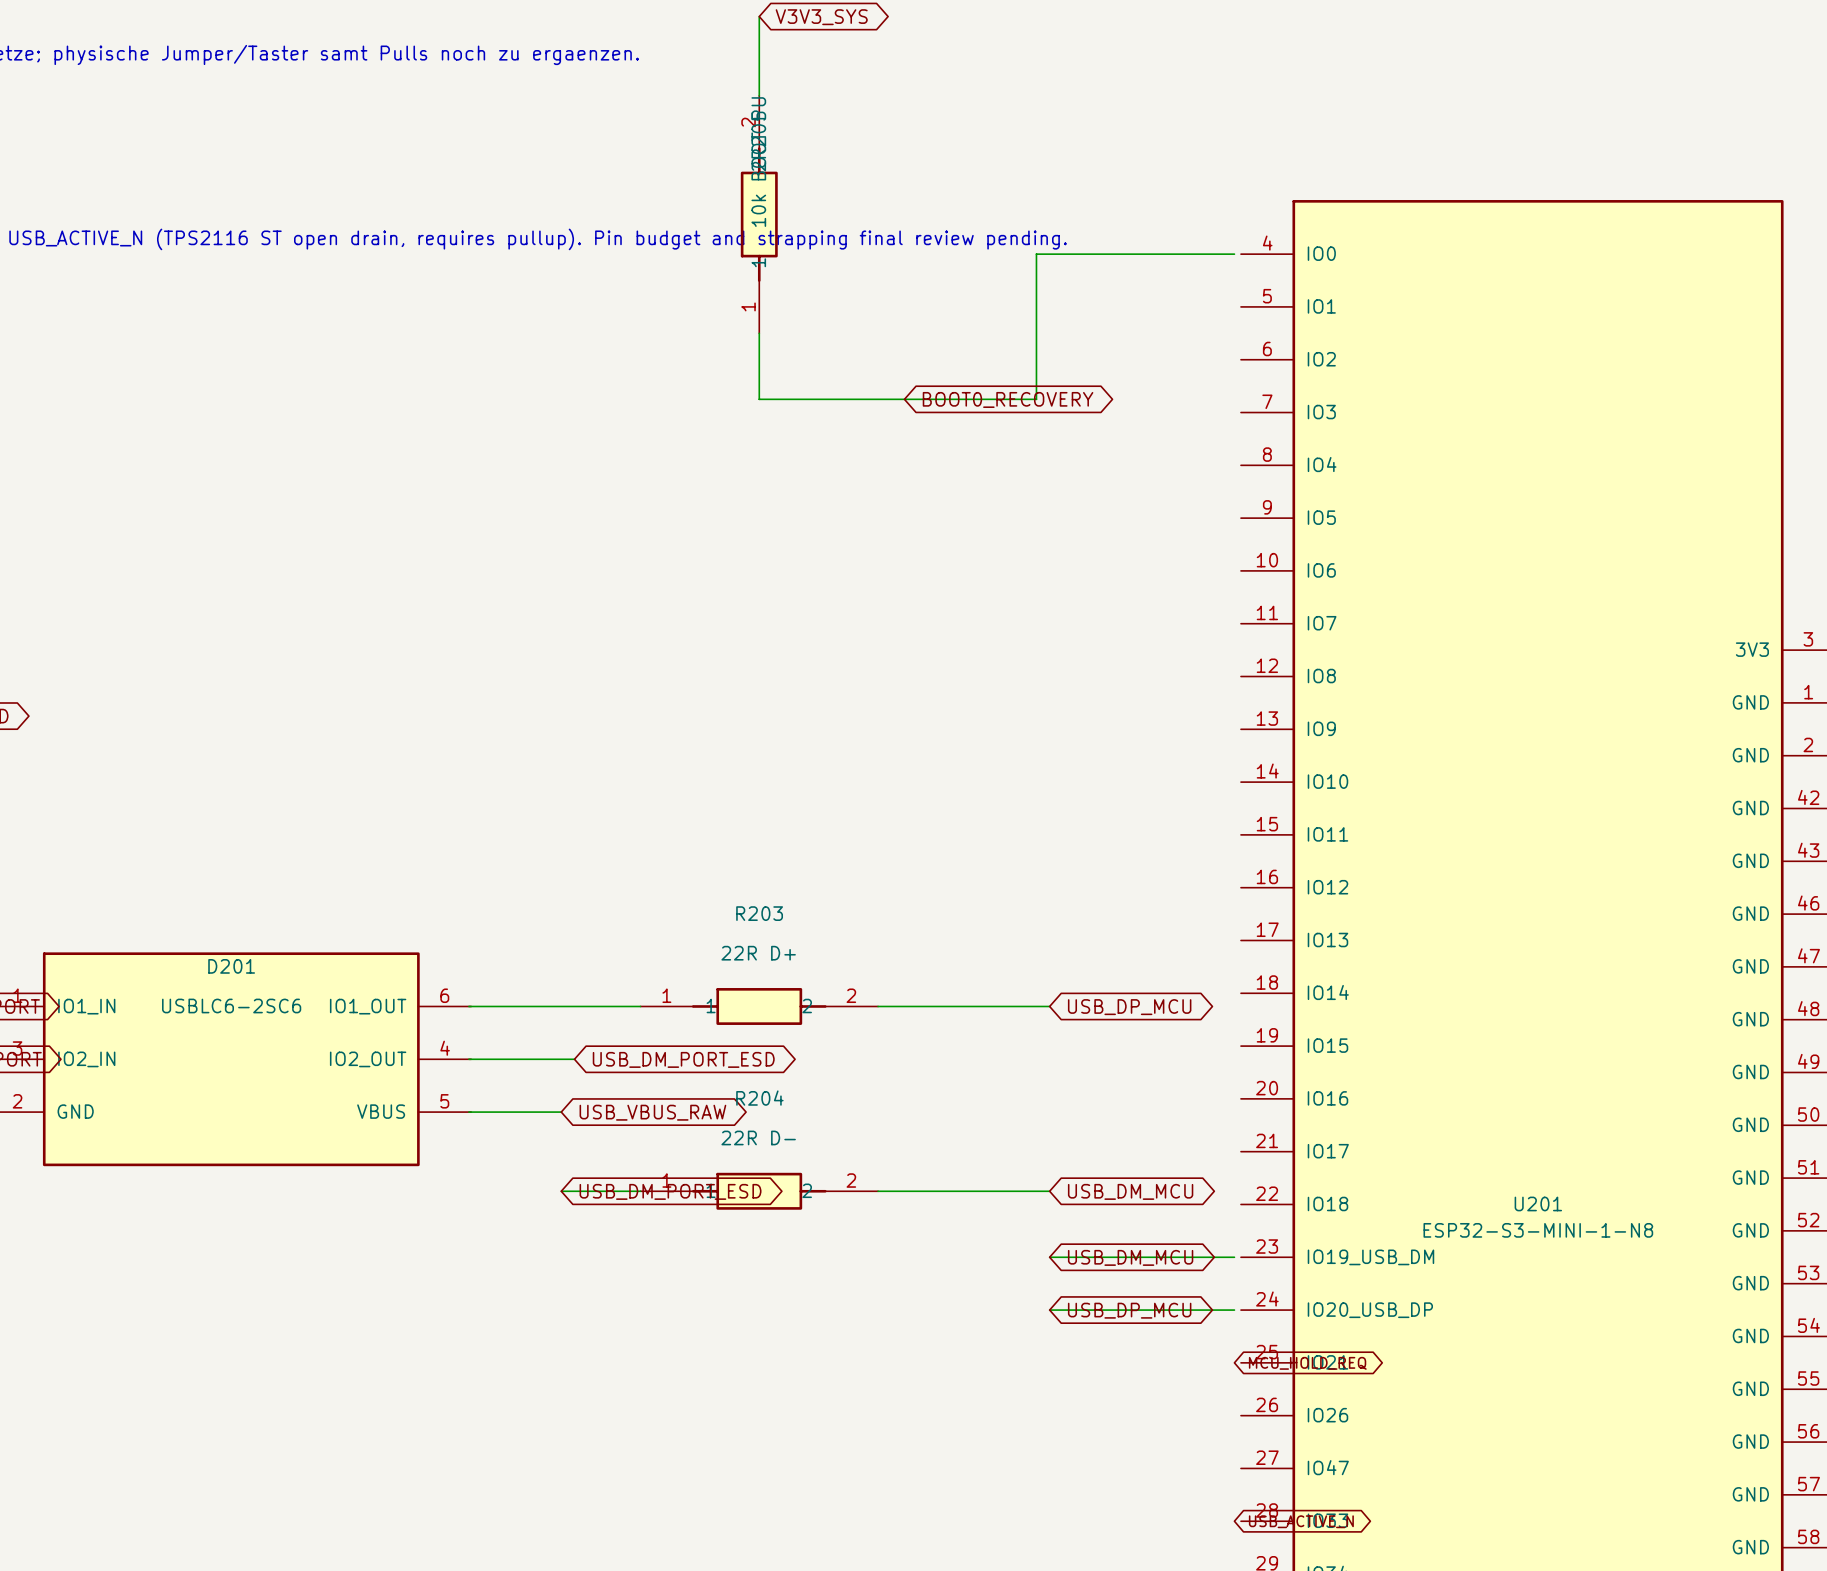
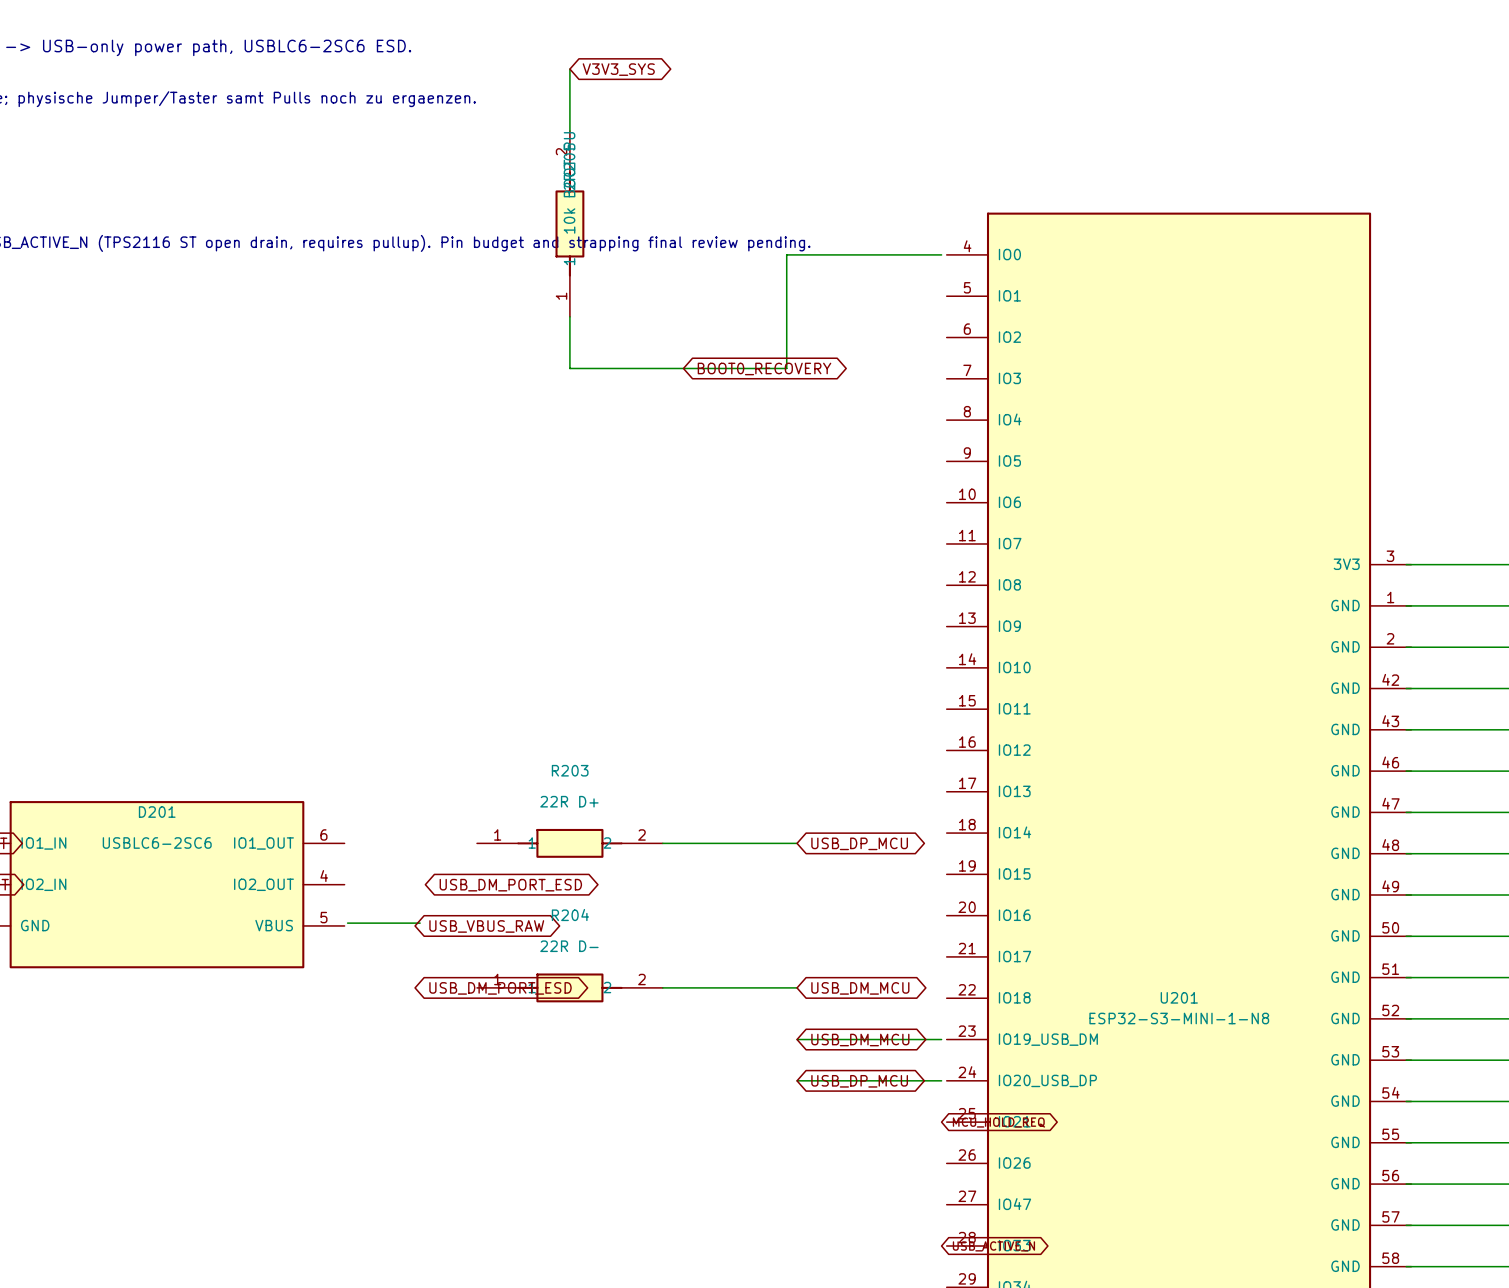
wire: (468, 1006) (640, 1006) -> none
wire: (468, 1059) (574, 1059) -> none
wire: none -> (347, 923) (420, 923)
wire: (468, 1112) (561, 1112) -> none
wire: (561, 1191) (640, 1191) -> none

